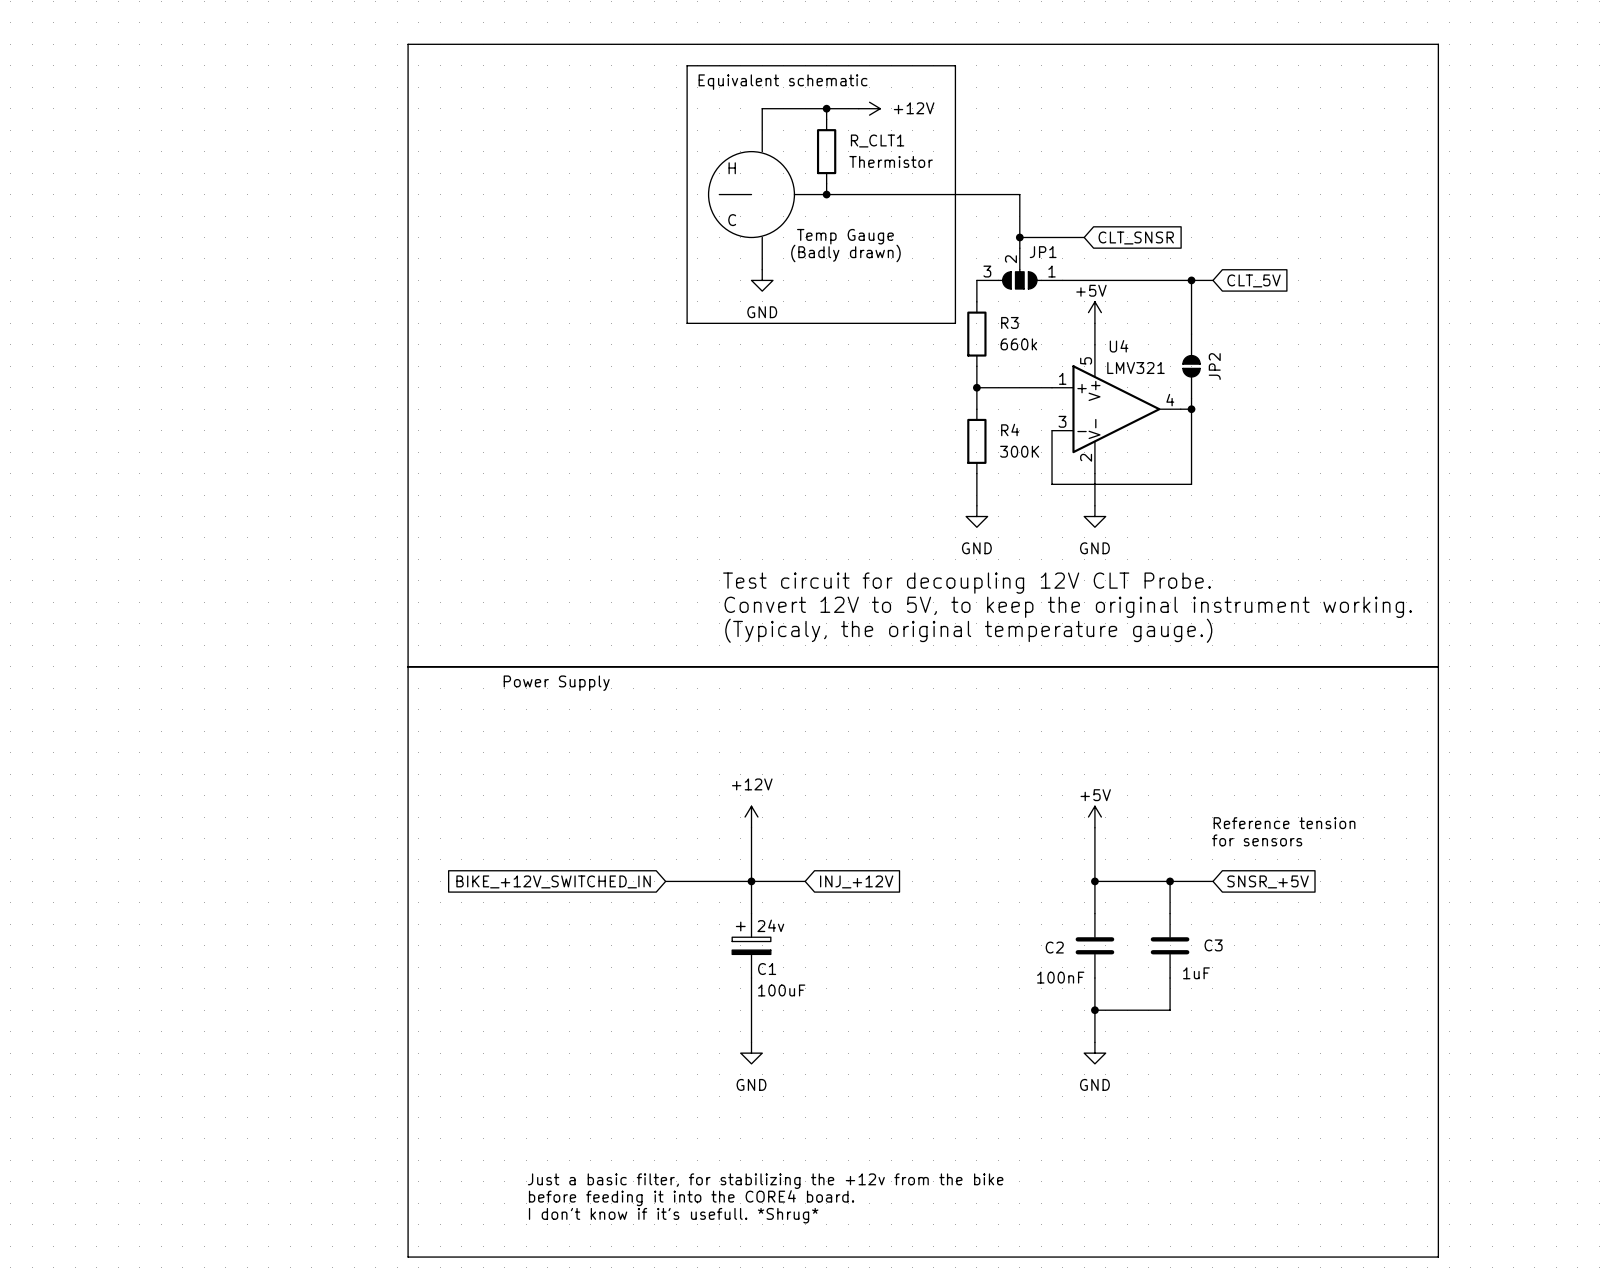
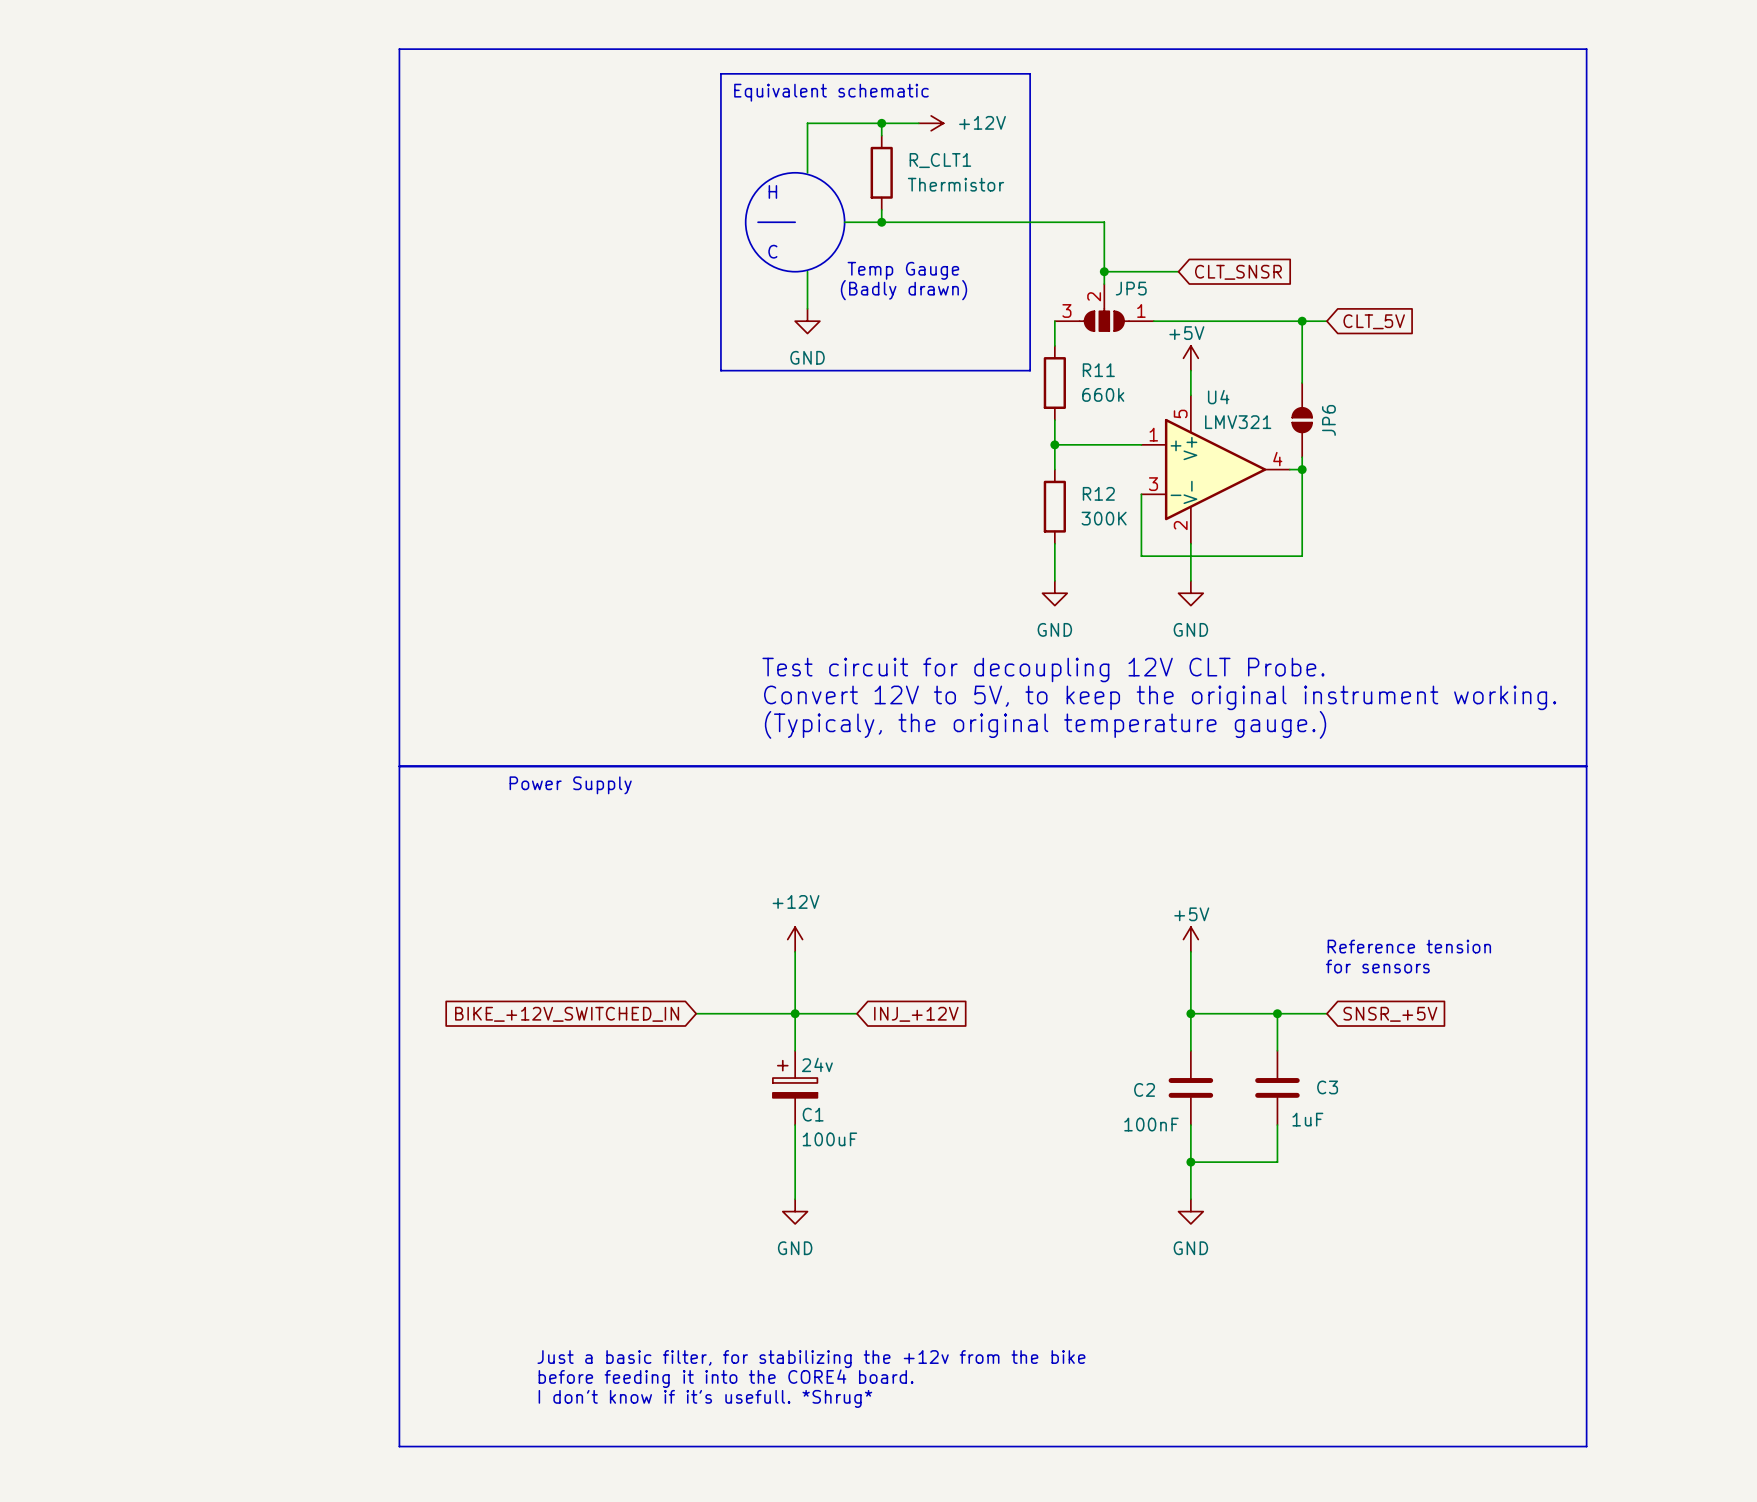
JP1 name: JP1 (1043, 252) -> JP5 (1131, 288)
R3 name: R3 (1009, 322) -> R11 (1098, 370)
JP2 name: JP2 (1214, 366) -> JP6 (1328, 420)
R4 name: R4 (1010, 430) -> R12 (1098, 493)

